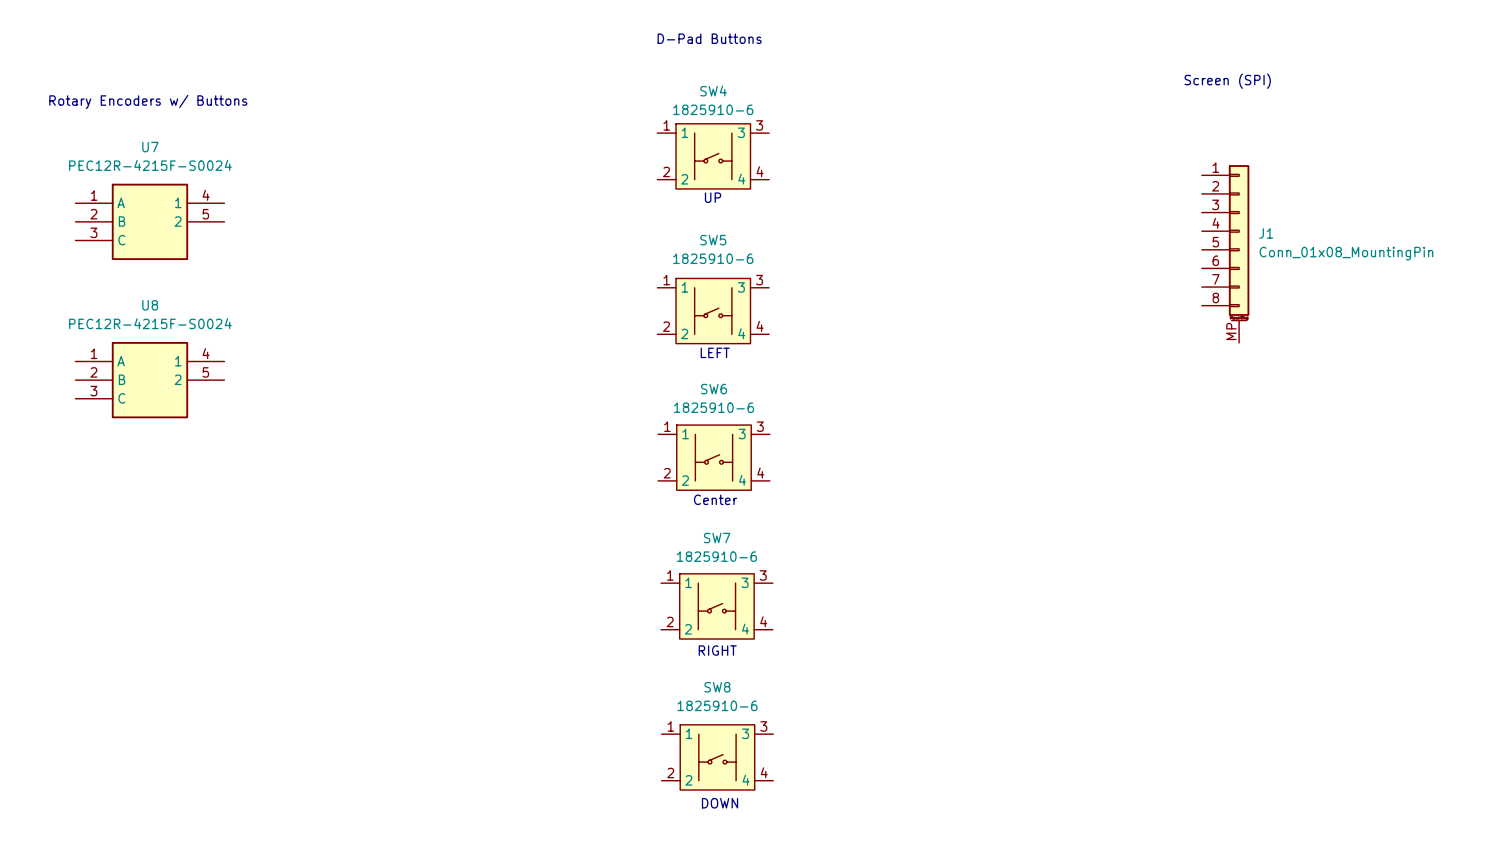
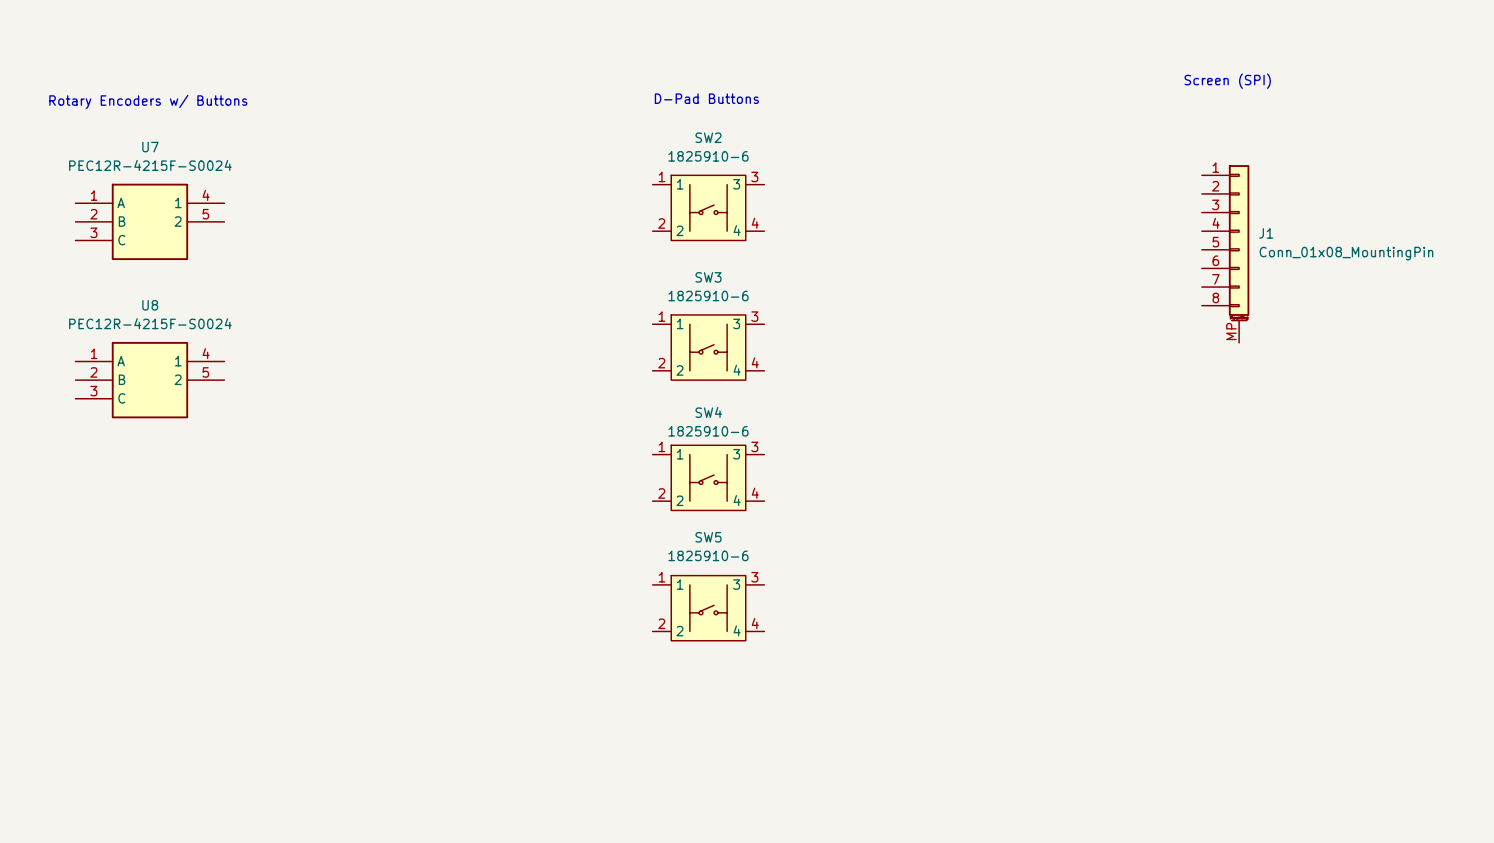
text position: D-Pad Buttons (709, 38) -> D-Pad Buttons (706, 98)
SW4 position: (713, 156) -> (708, 477)
text: UP (713, 197) -> none
SW2: none -> 1825910-6 (708, 207)
SW5 position: (713, 311) -> (708, 608)
SW3: none -> 1825910-6 (708, 347)
text: LEFT (715, 352) -> none
SW6: 1825910-6 (713, 457) -> none
text: Center (715, 499) -> none
SW7: 1825910-6 (716, 606) -> none
text: RIGHT (717, 650) -> none
SW8: 1825910-6 (717, 757) -> none
text: DOWN (720, 803) -> none

